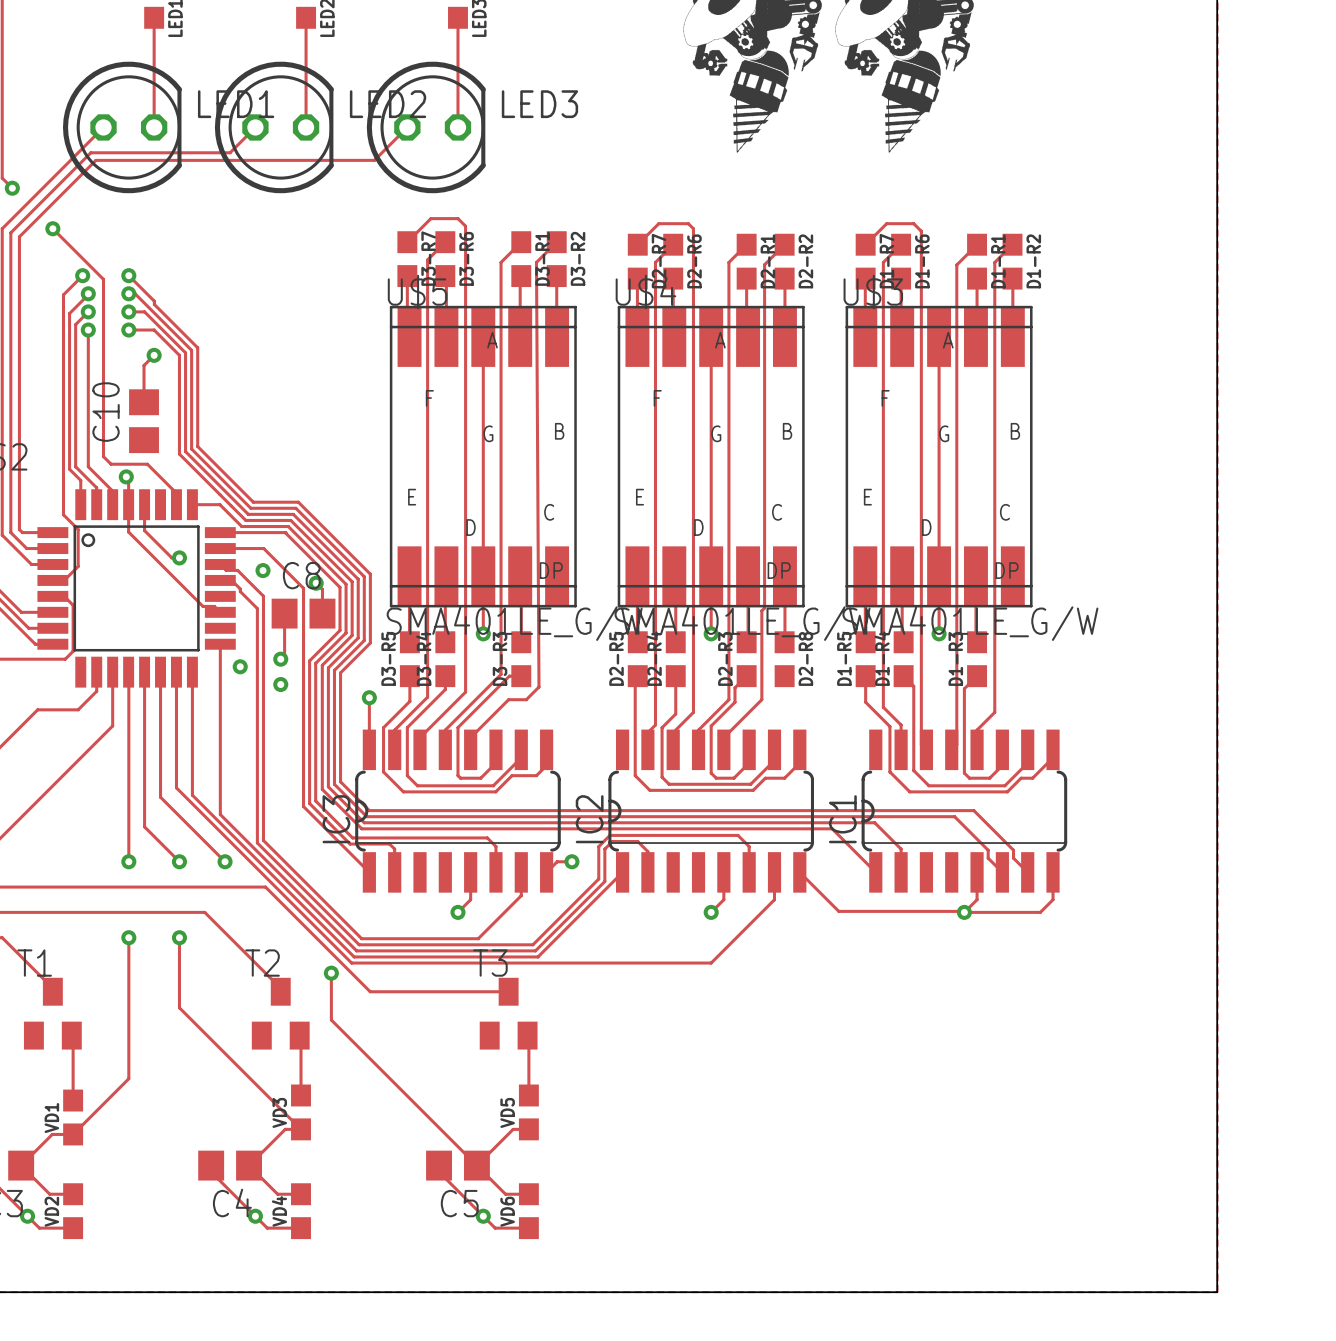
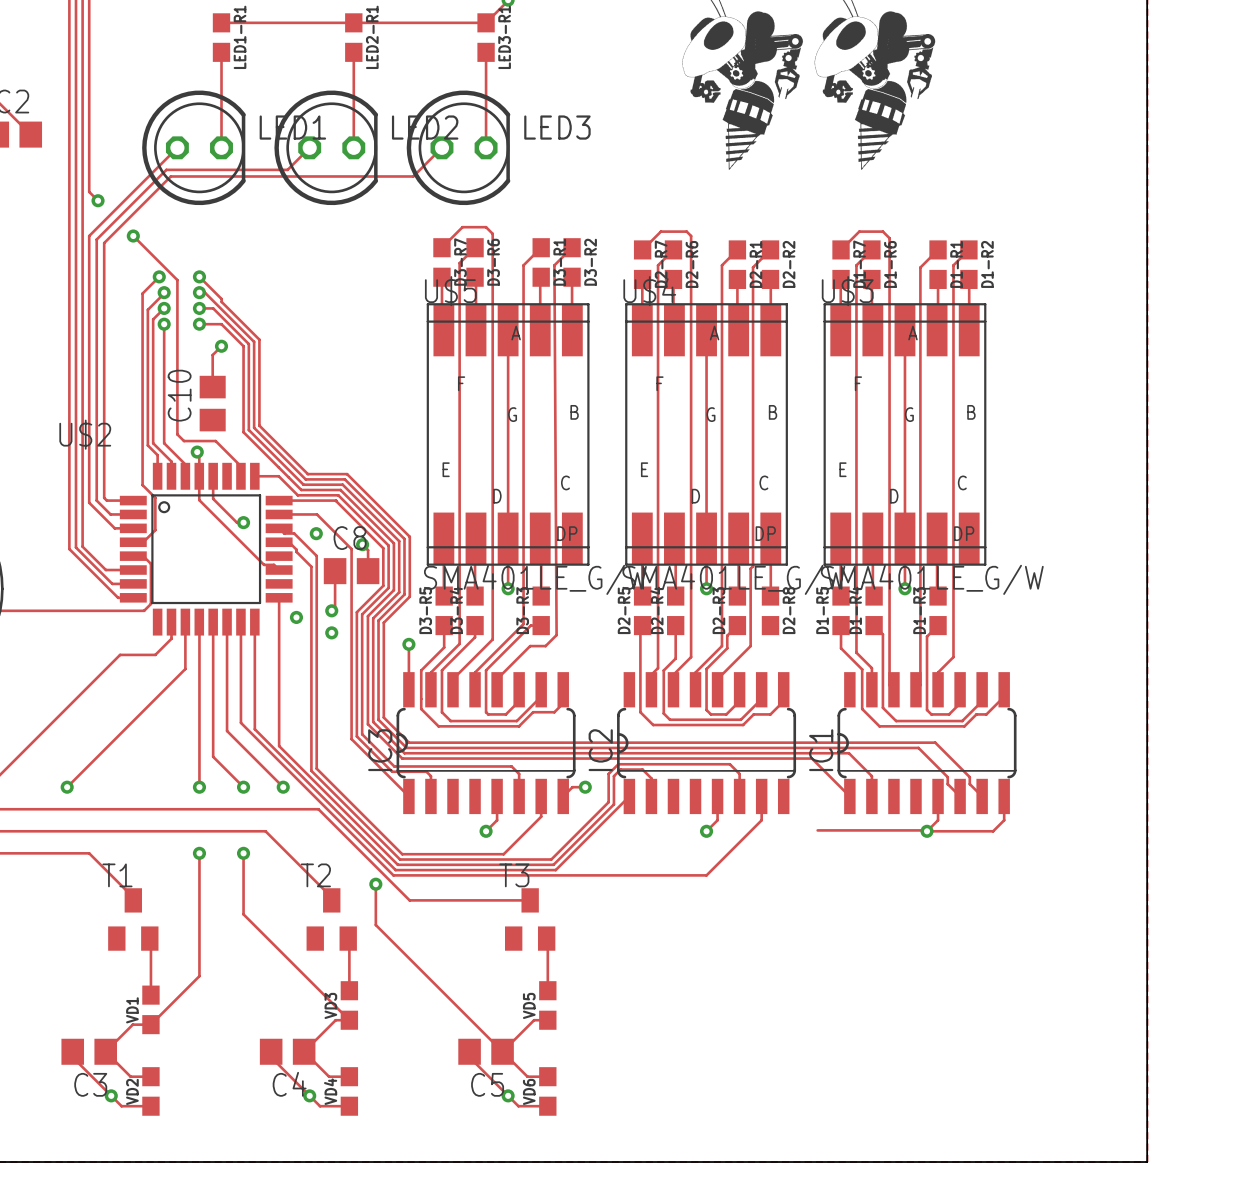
track: (799, 872) (838, 911) -> none

